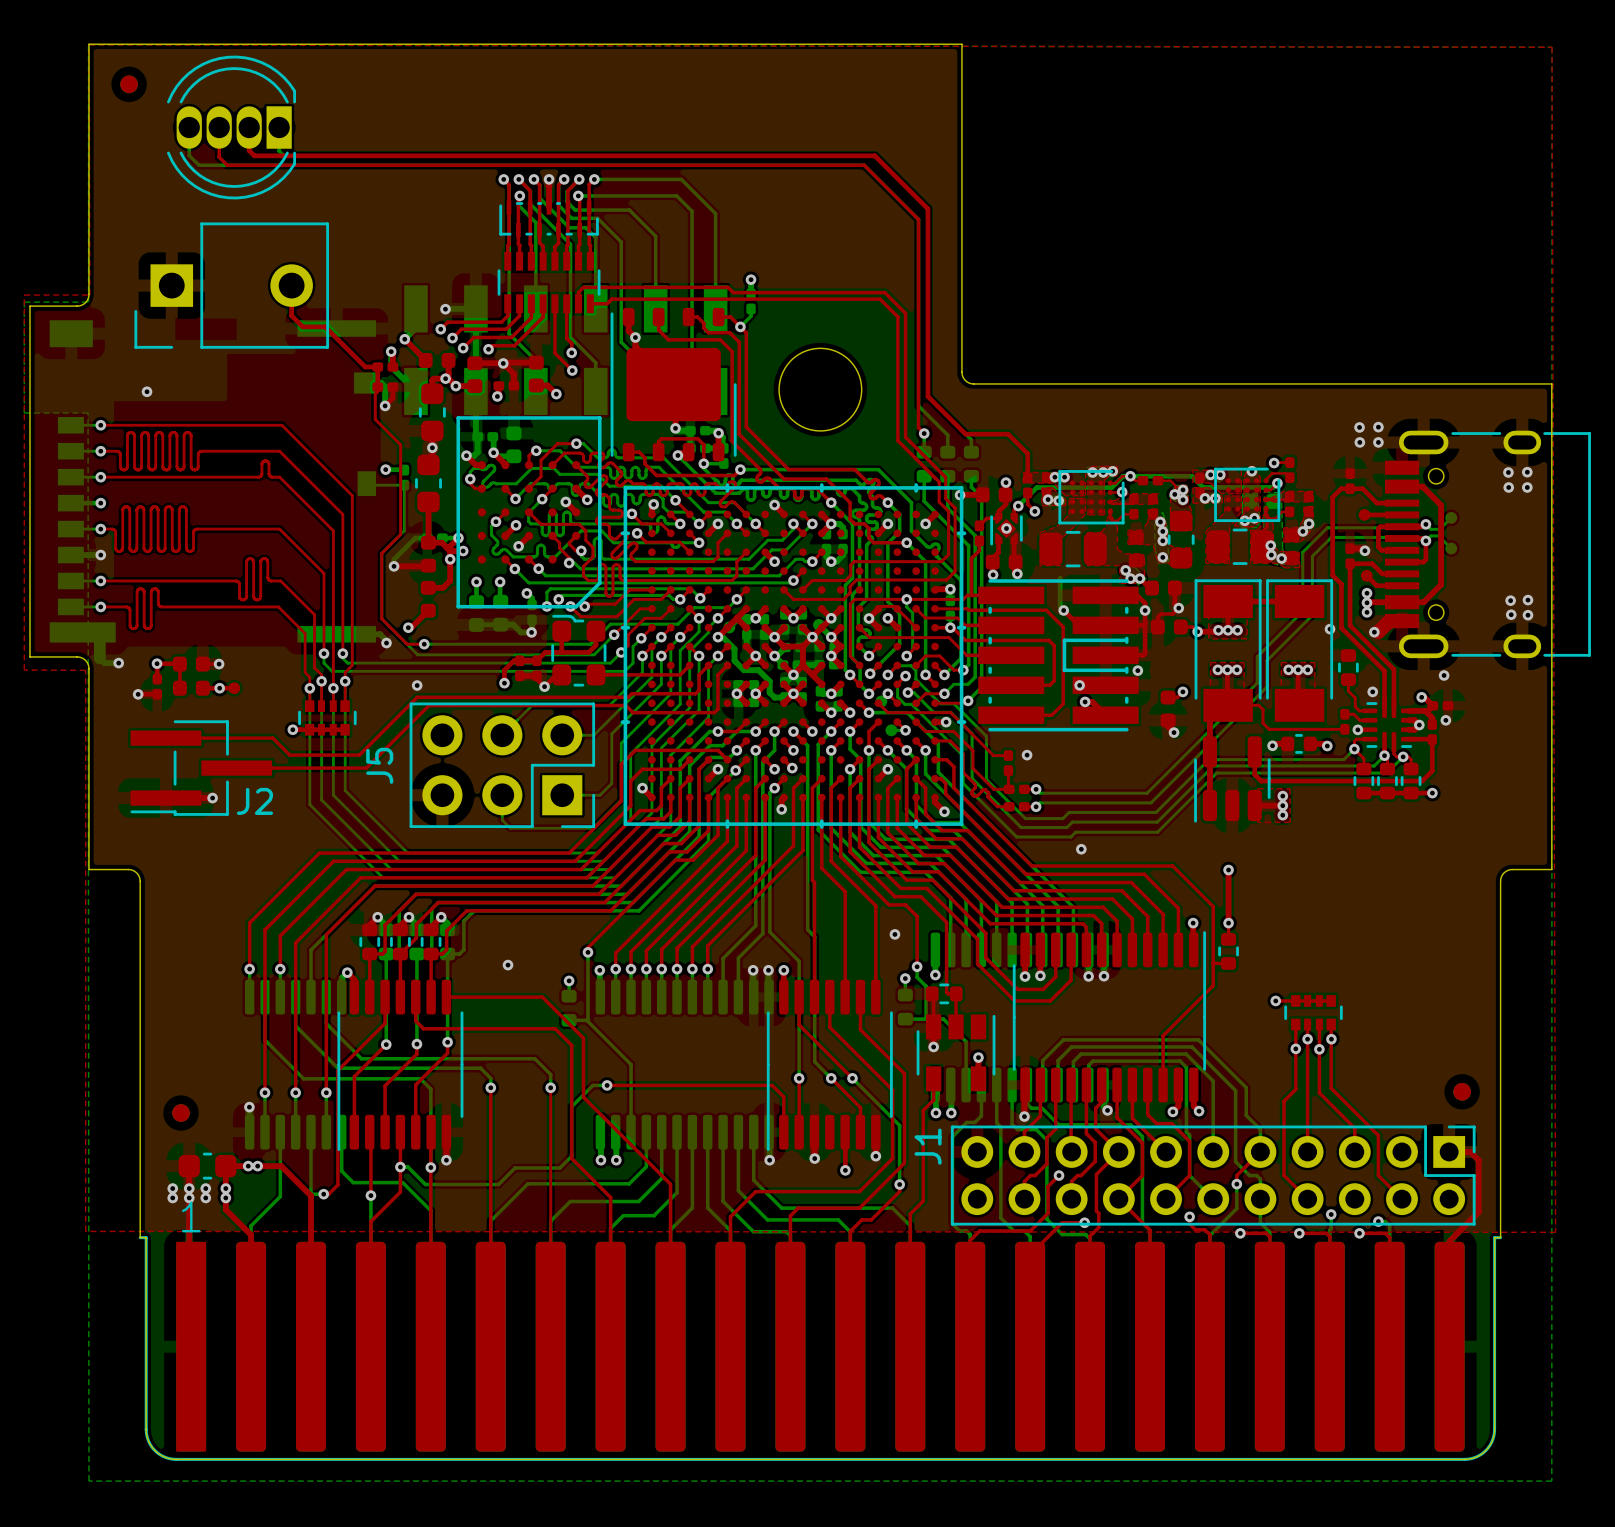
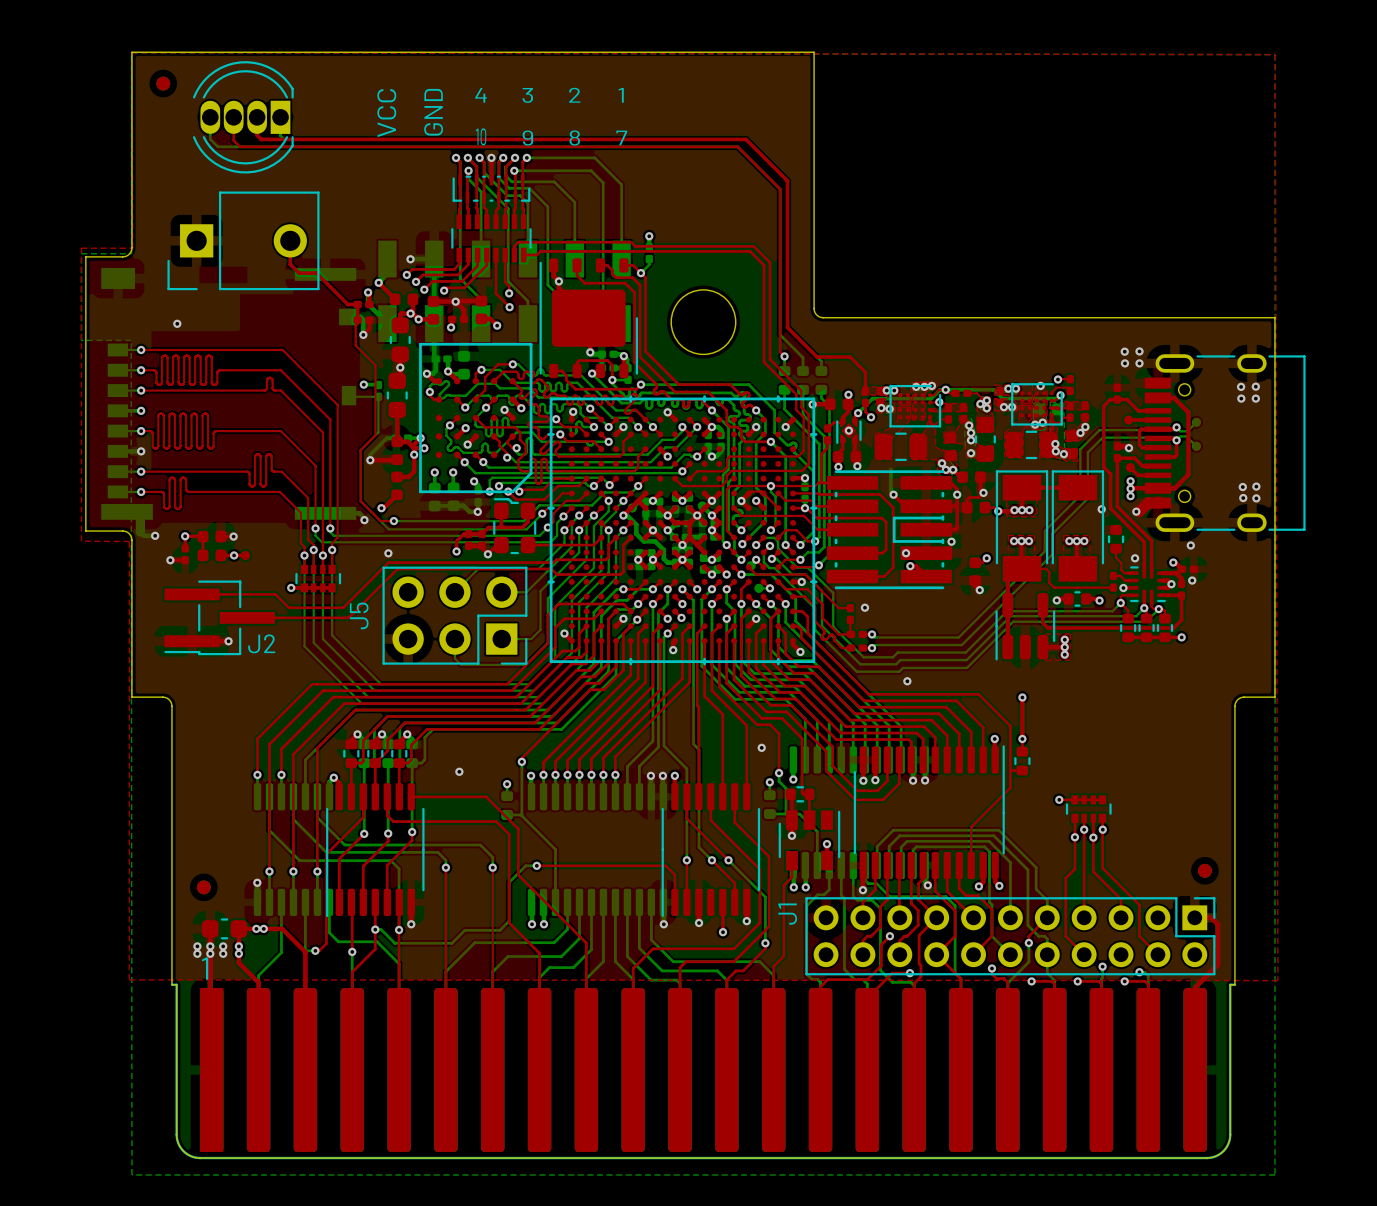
text: none -> 4 (480, 95)
text: none -> 3 (527, 95)
text: none -> 2 (574, 95)
text: none -> 1 (621, 95)
text: none -> GND (433, 112)
text: none -> VCC (386, 113)
text: none -> 10 (481, 136)
text: none -> 9 (527, 138)
text: none -> 8 (574, 137)
text: none -> 7 (621, 138)

